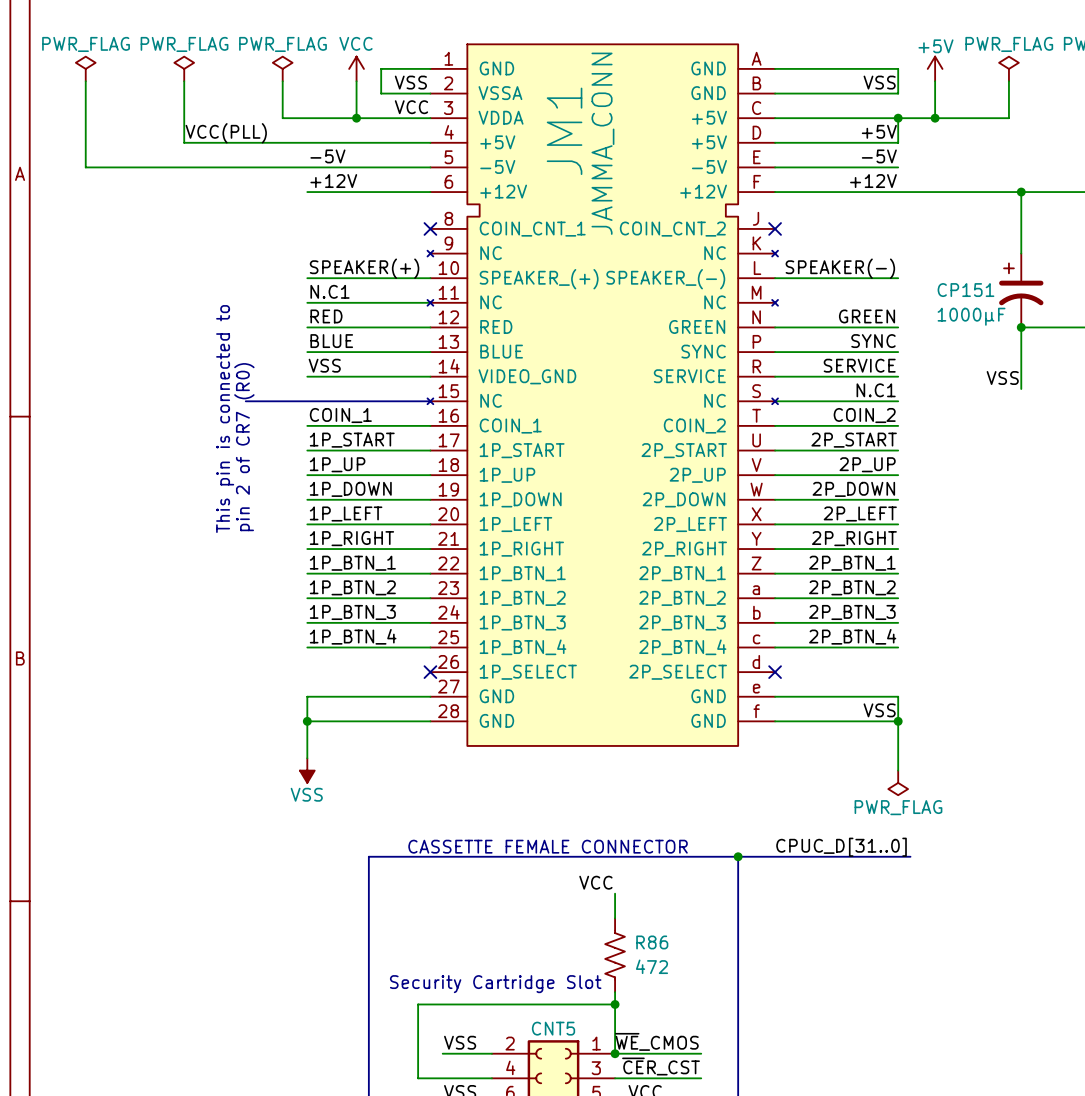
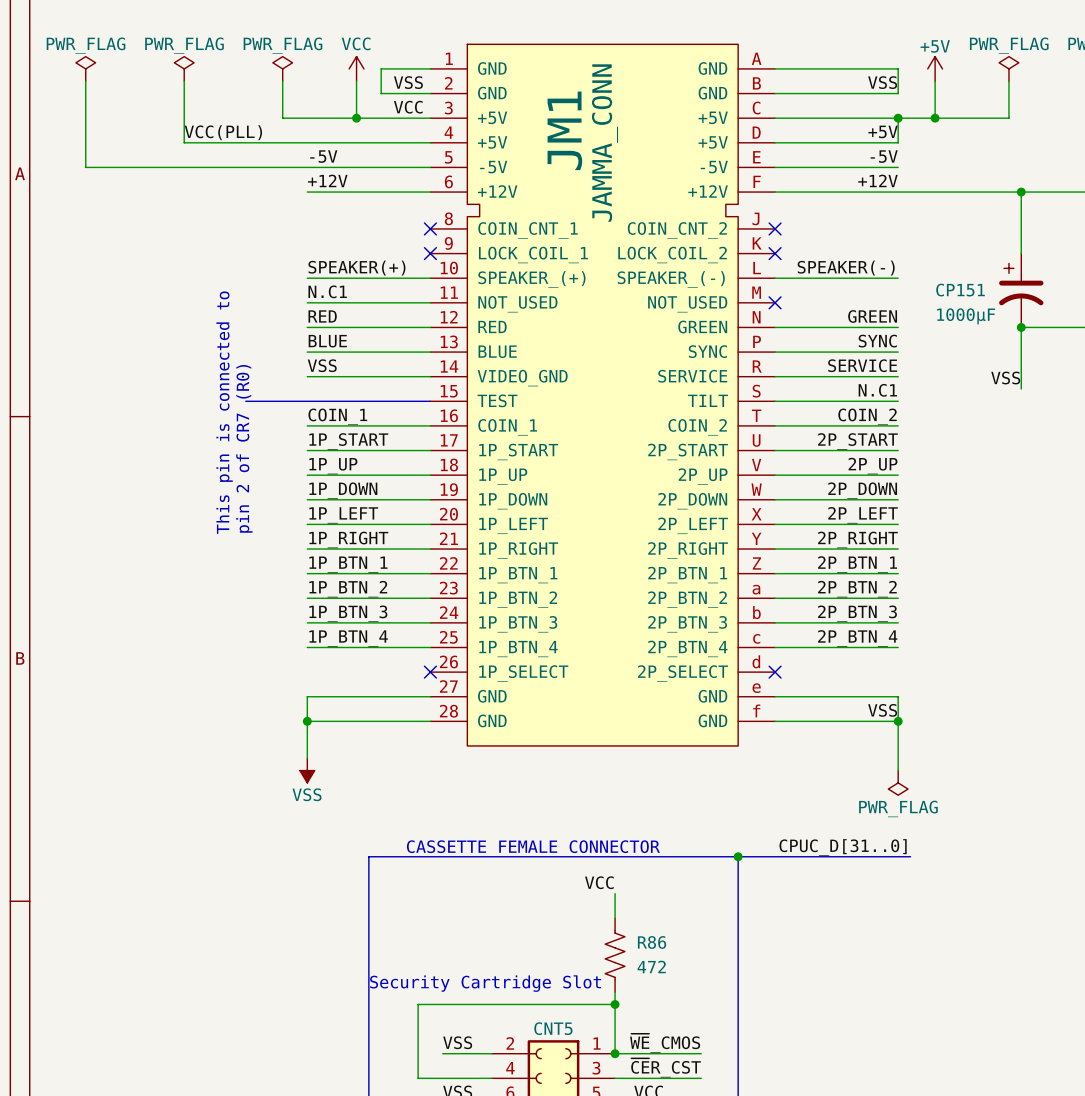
JM1 symbol: [427, 44, 778, 746] -> [430, 44, 776, 746]
no-connect mark: none -> (430, 253)
no-connect mark: none -> (775, 253)
no-connect mark: none -> (775, 302)

